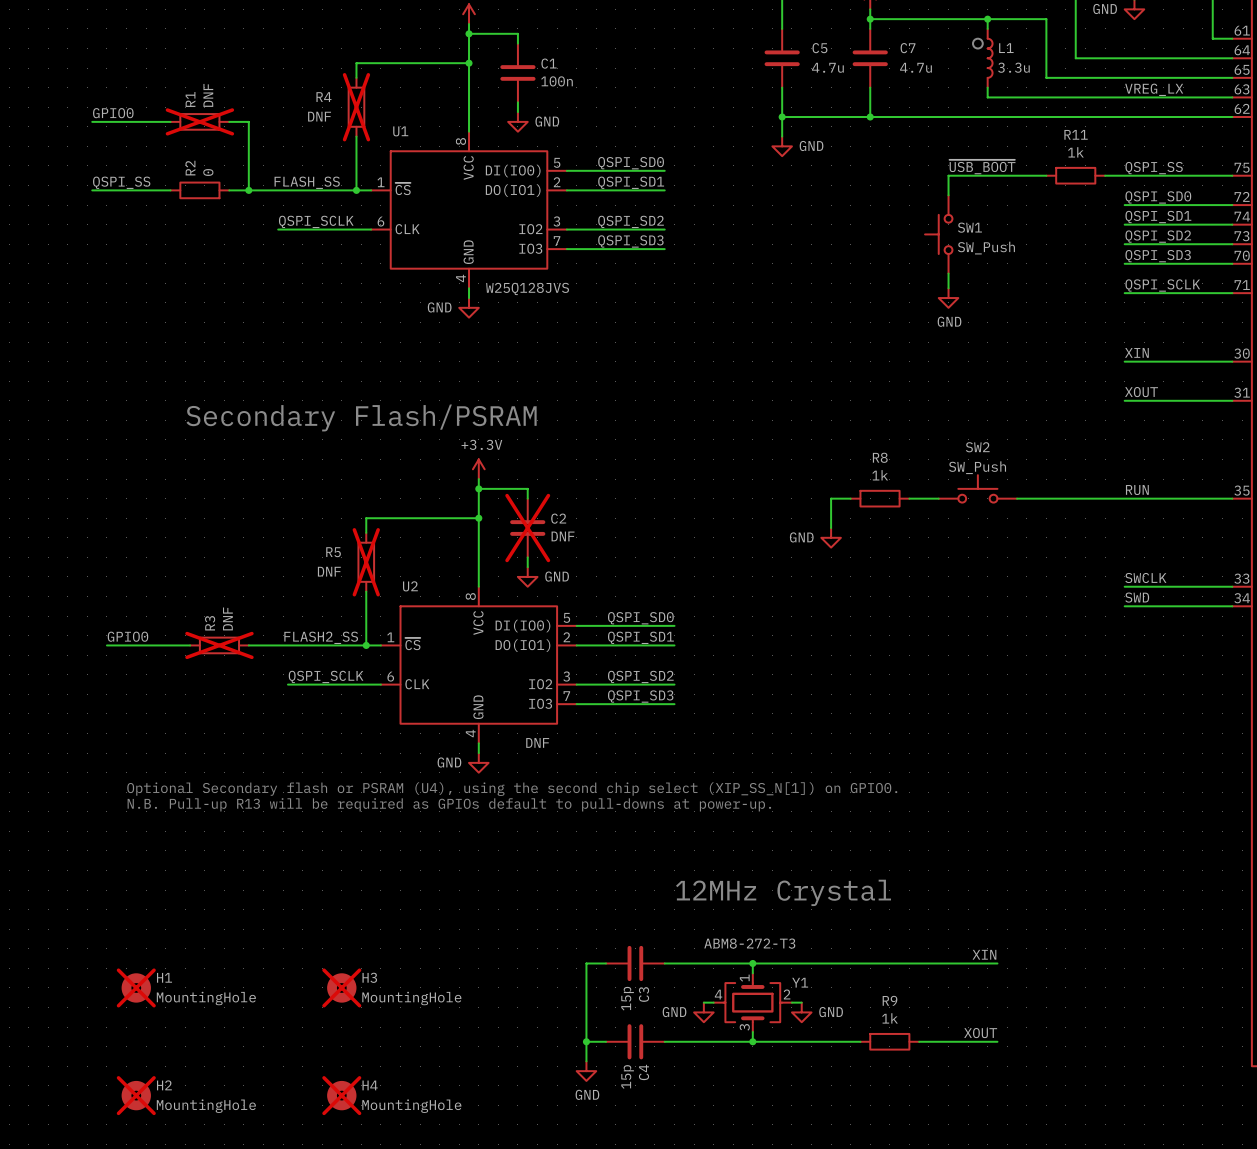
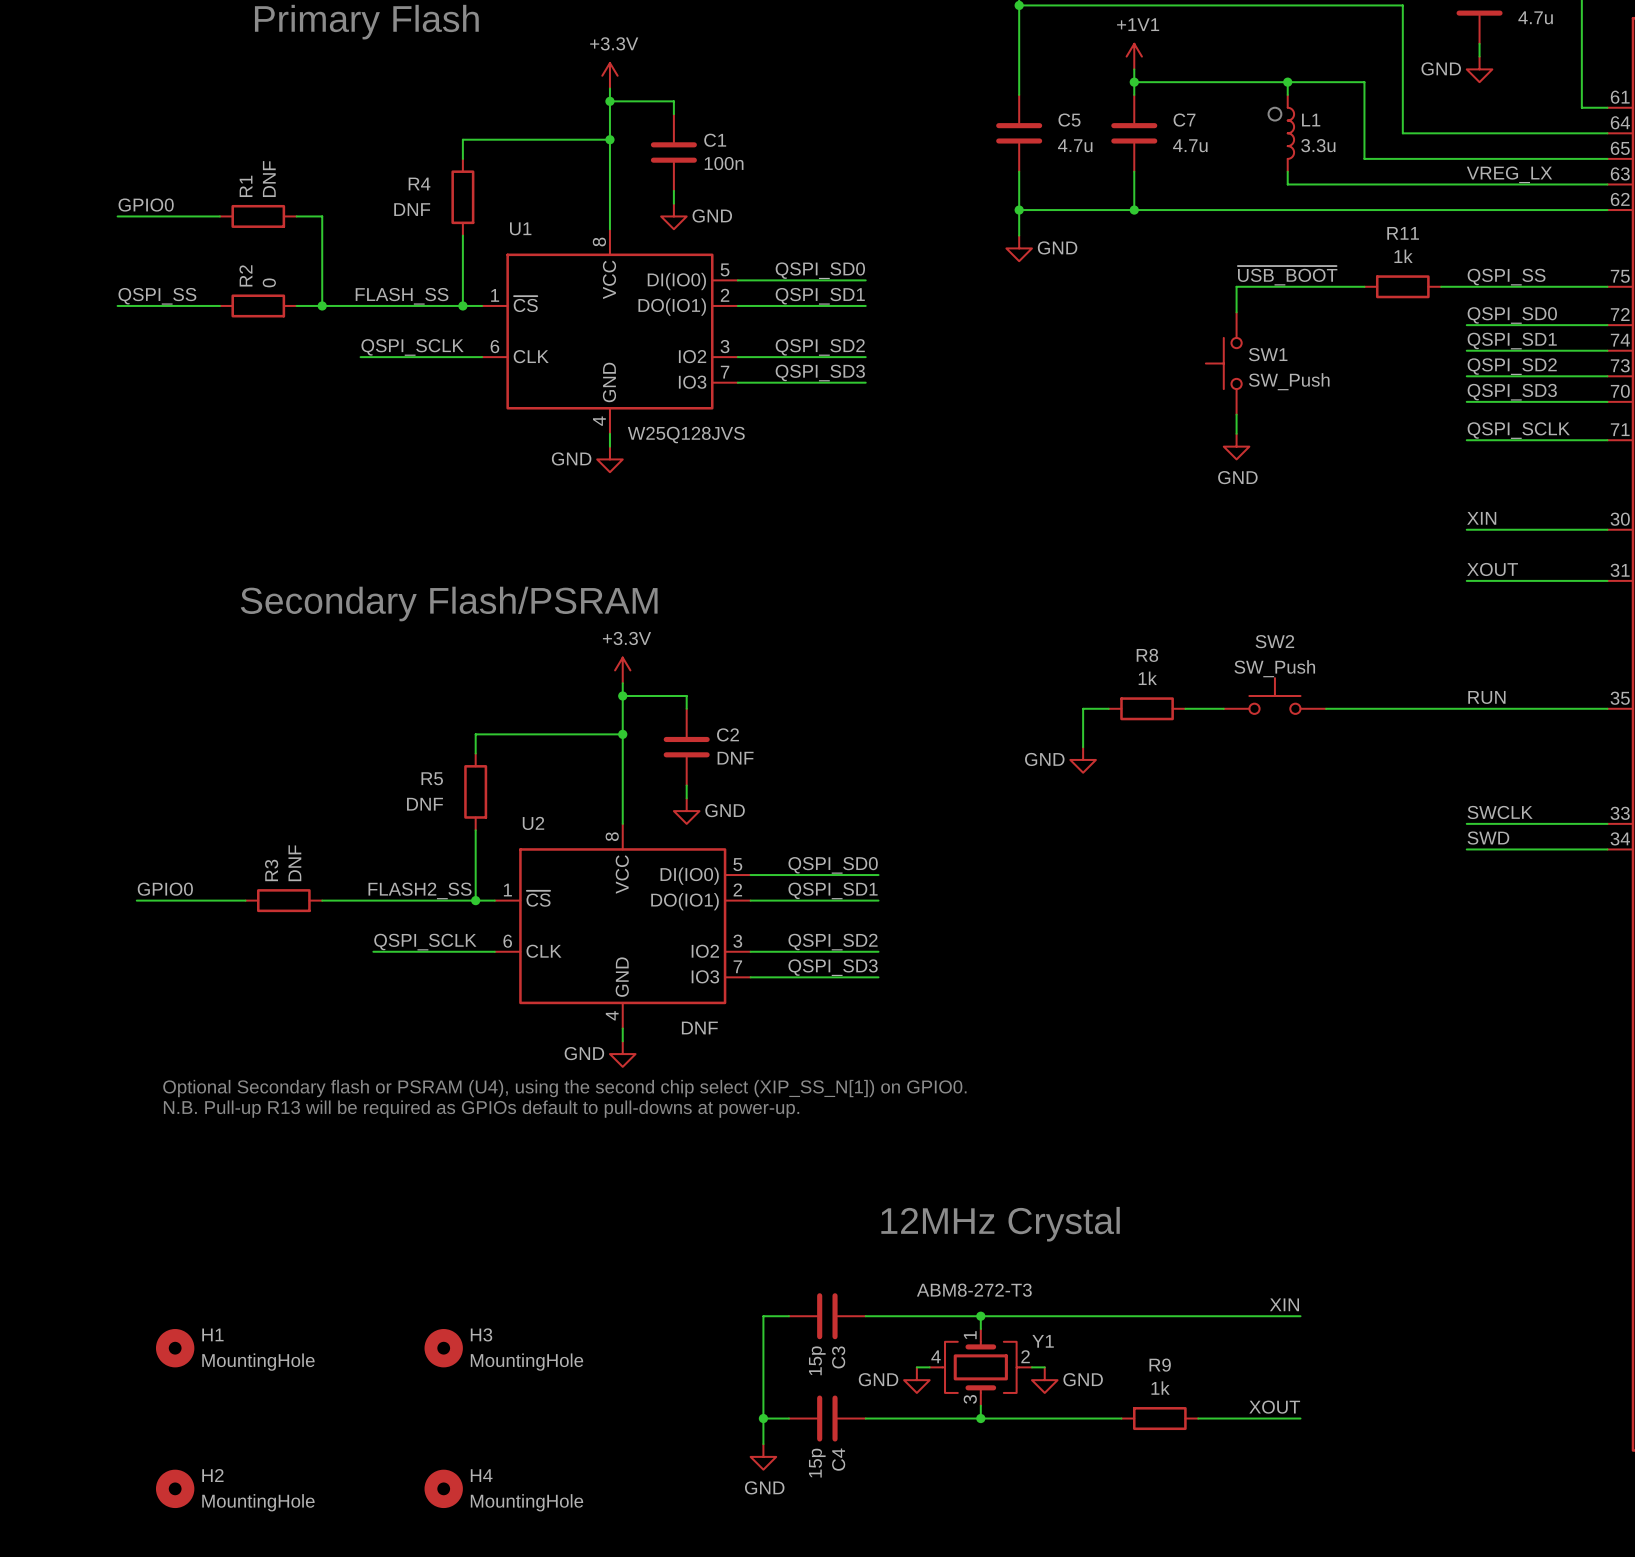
R4 do-not-place cross: (356, 107) -> none
R1 do-not-place cross: (199, 121) -> none
C2 do-not-place cross: (527, 528) -> none
R5 do-not-place cross: (366, 562) -> none
R3 do-not-place cross: (219, 645) -> none
H1 do-not-place cross: (136, 987) -> none
H3 do-not-place cross: (341, 987) -> none
H2 do-not-place cross: (136, 1095) -> none
H4 do-not-place cross: (341, 1095) -> none

